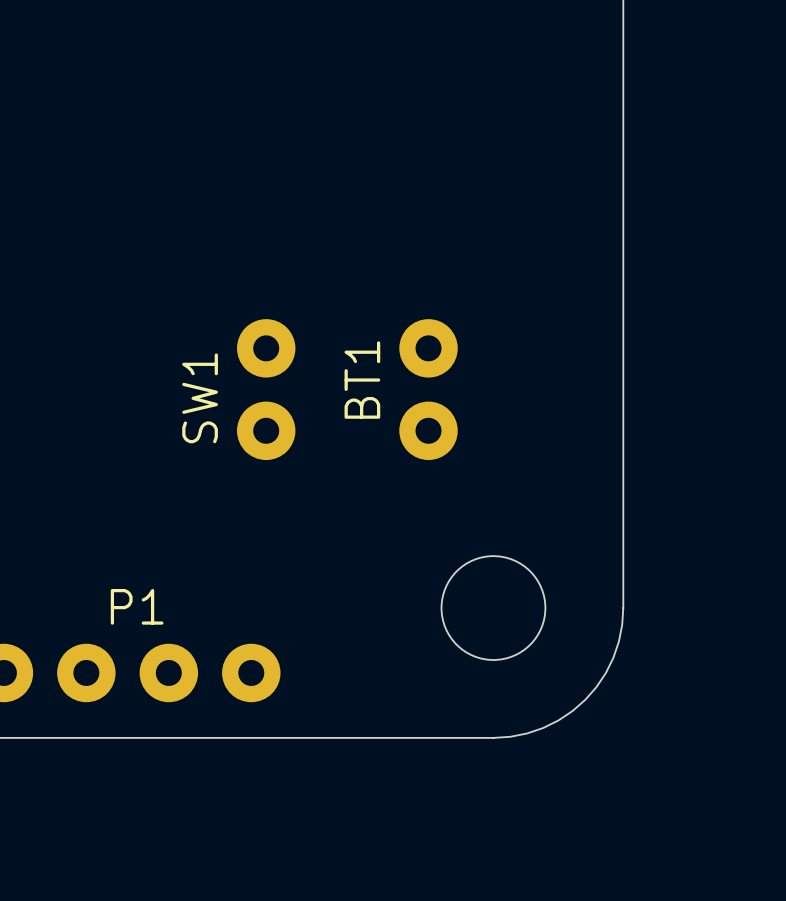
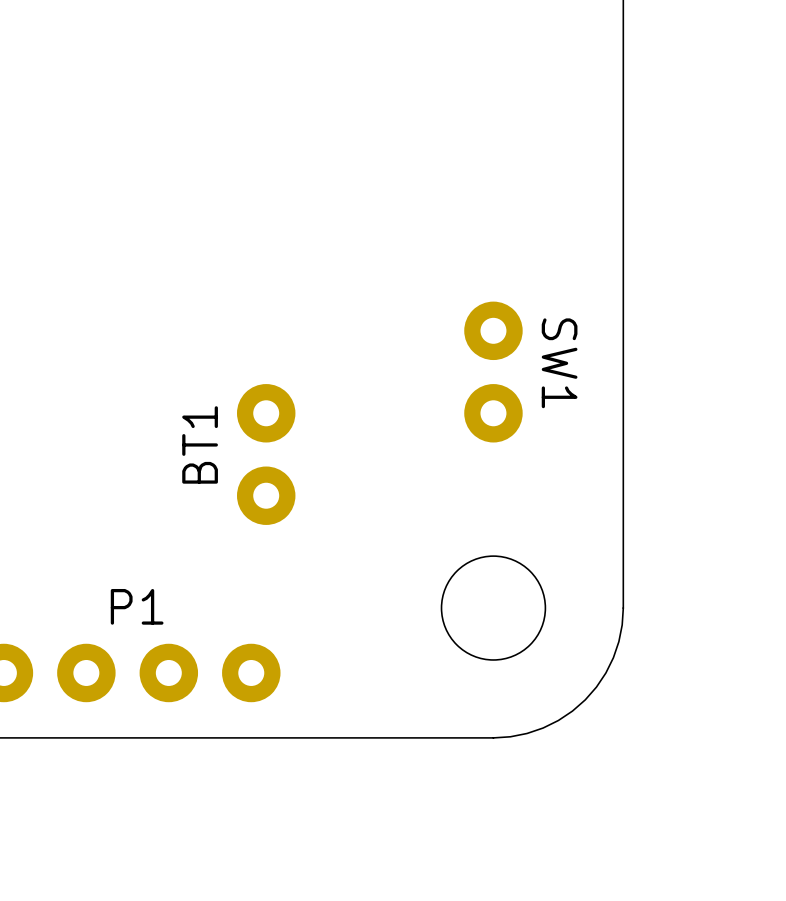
SW1 position: (266, 389) -> (493, 372)
BT1 position: (428, 389) -> (266, 454)
SW1 name rotation: 0° (200, 398) -> 180° (559, 363)
SW1 name position: SW1 (200, 398) -> SW1 (559, 363)

